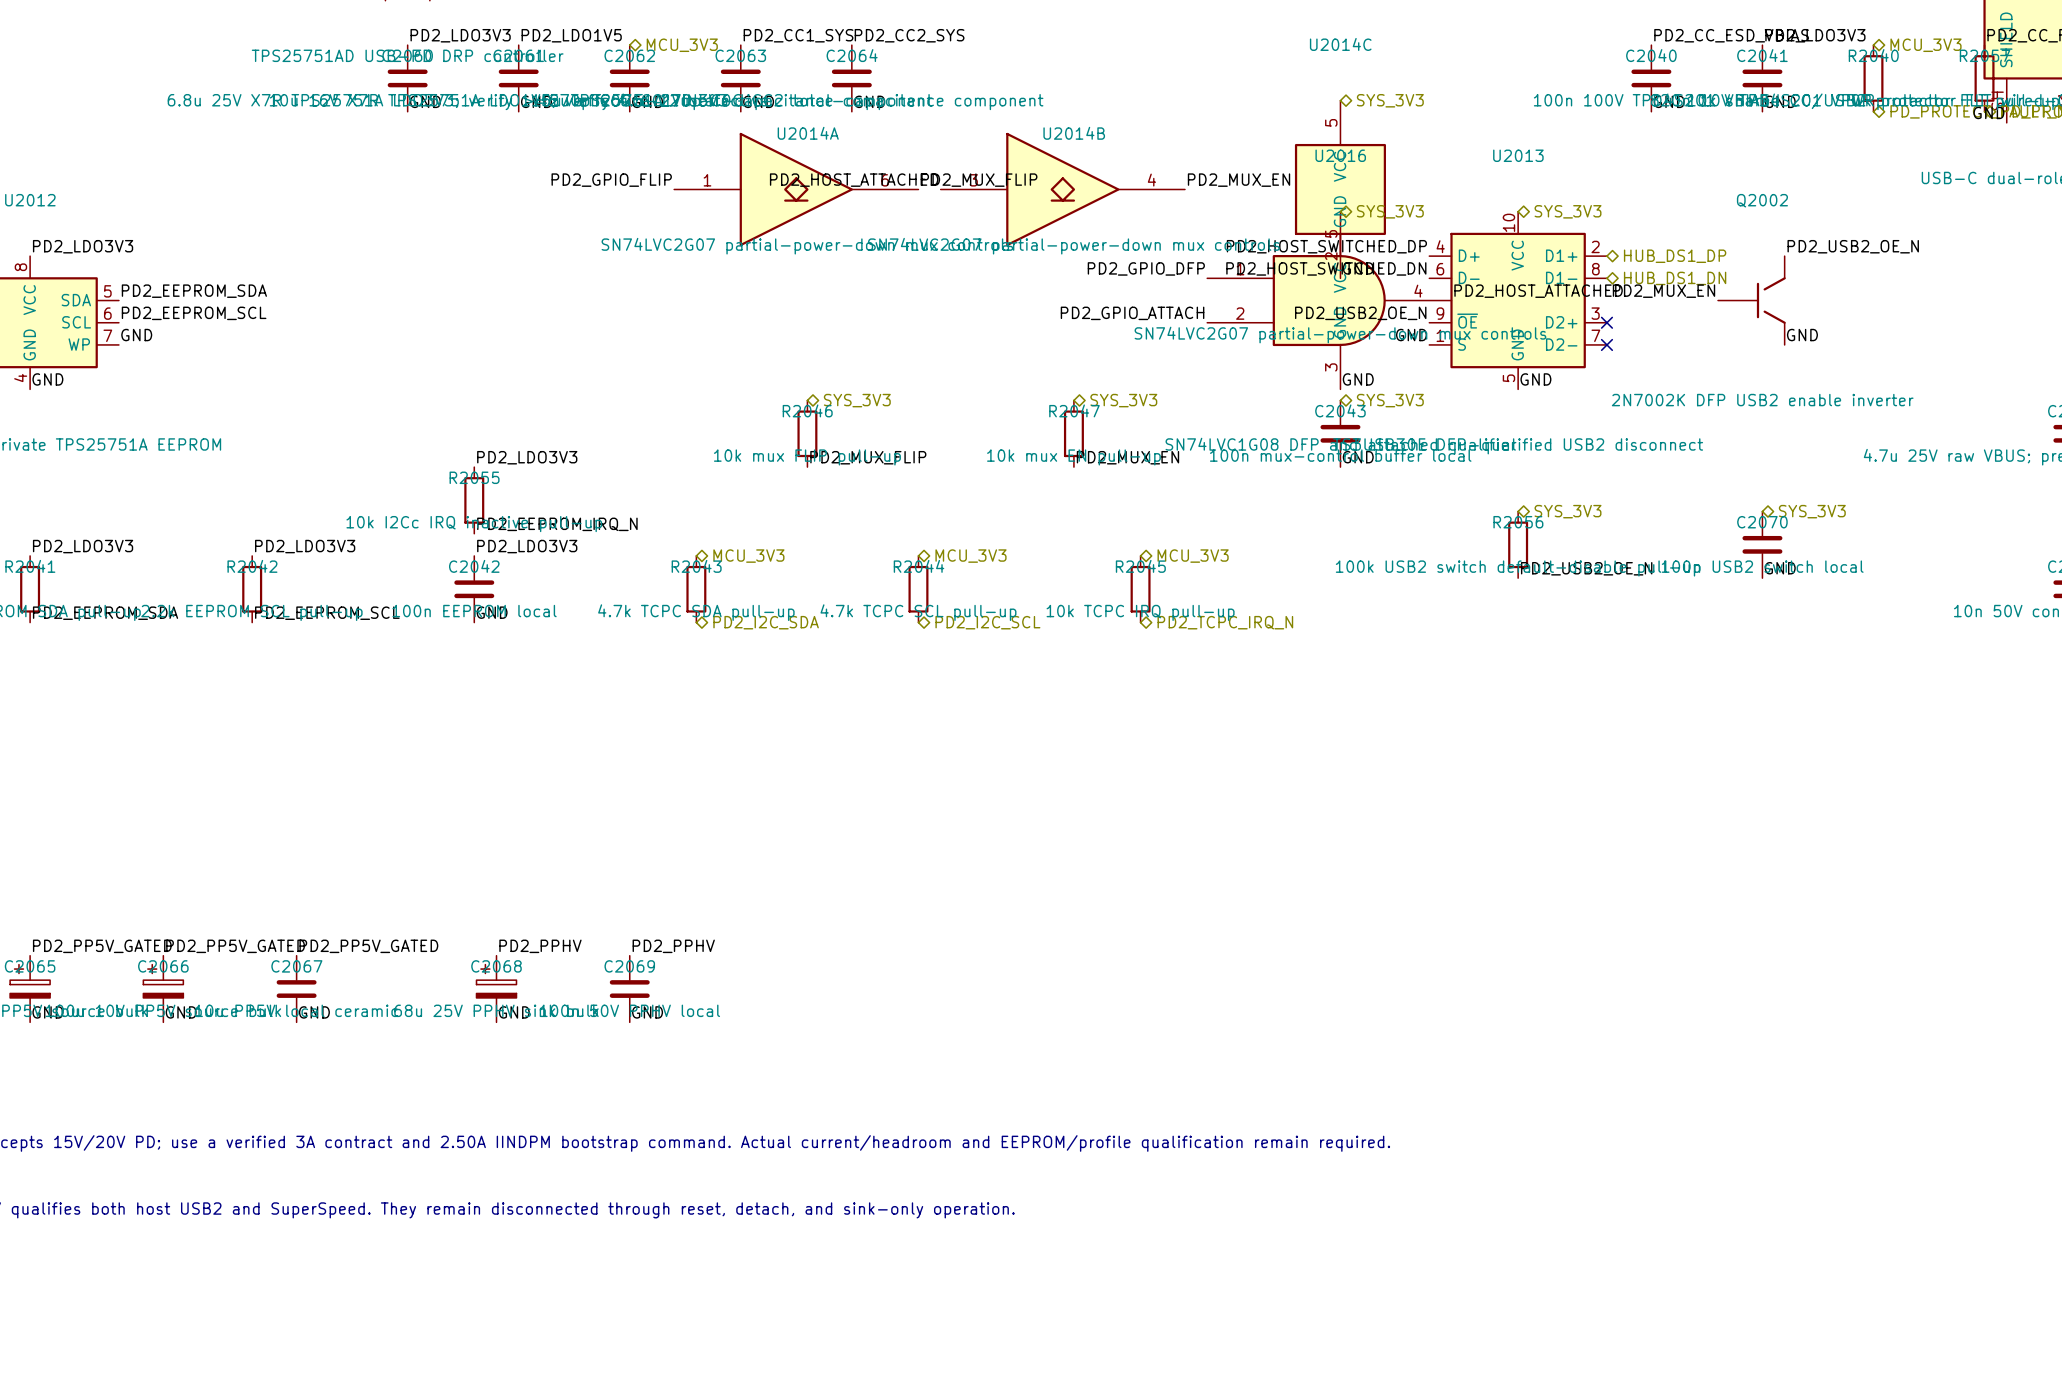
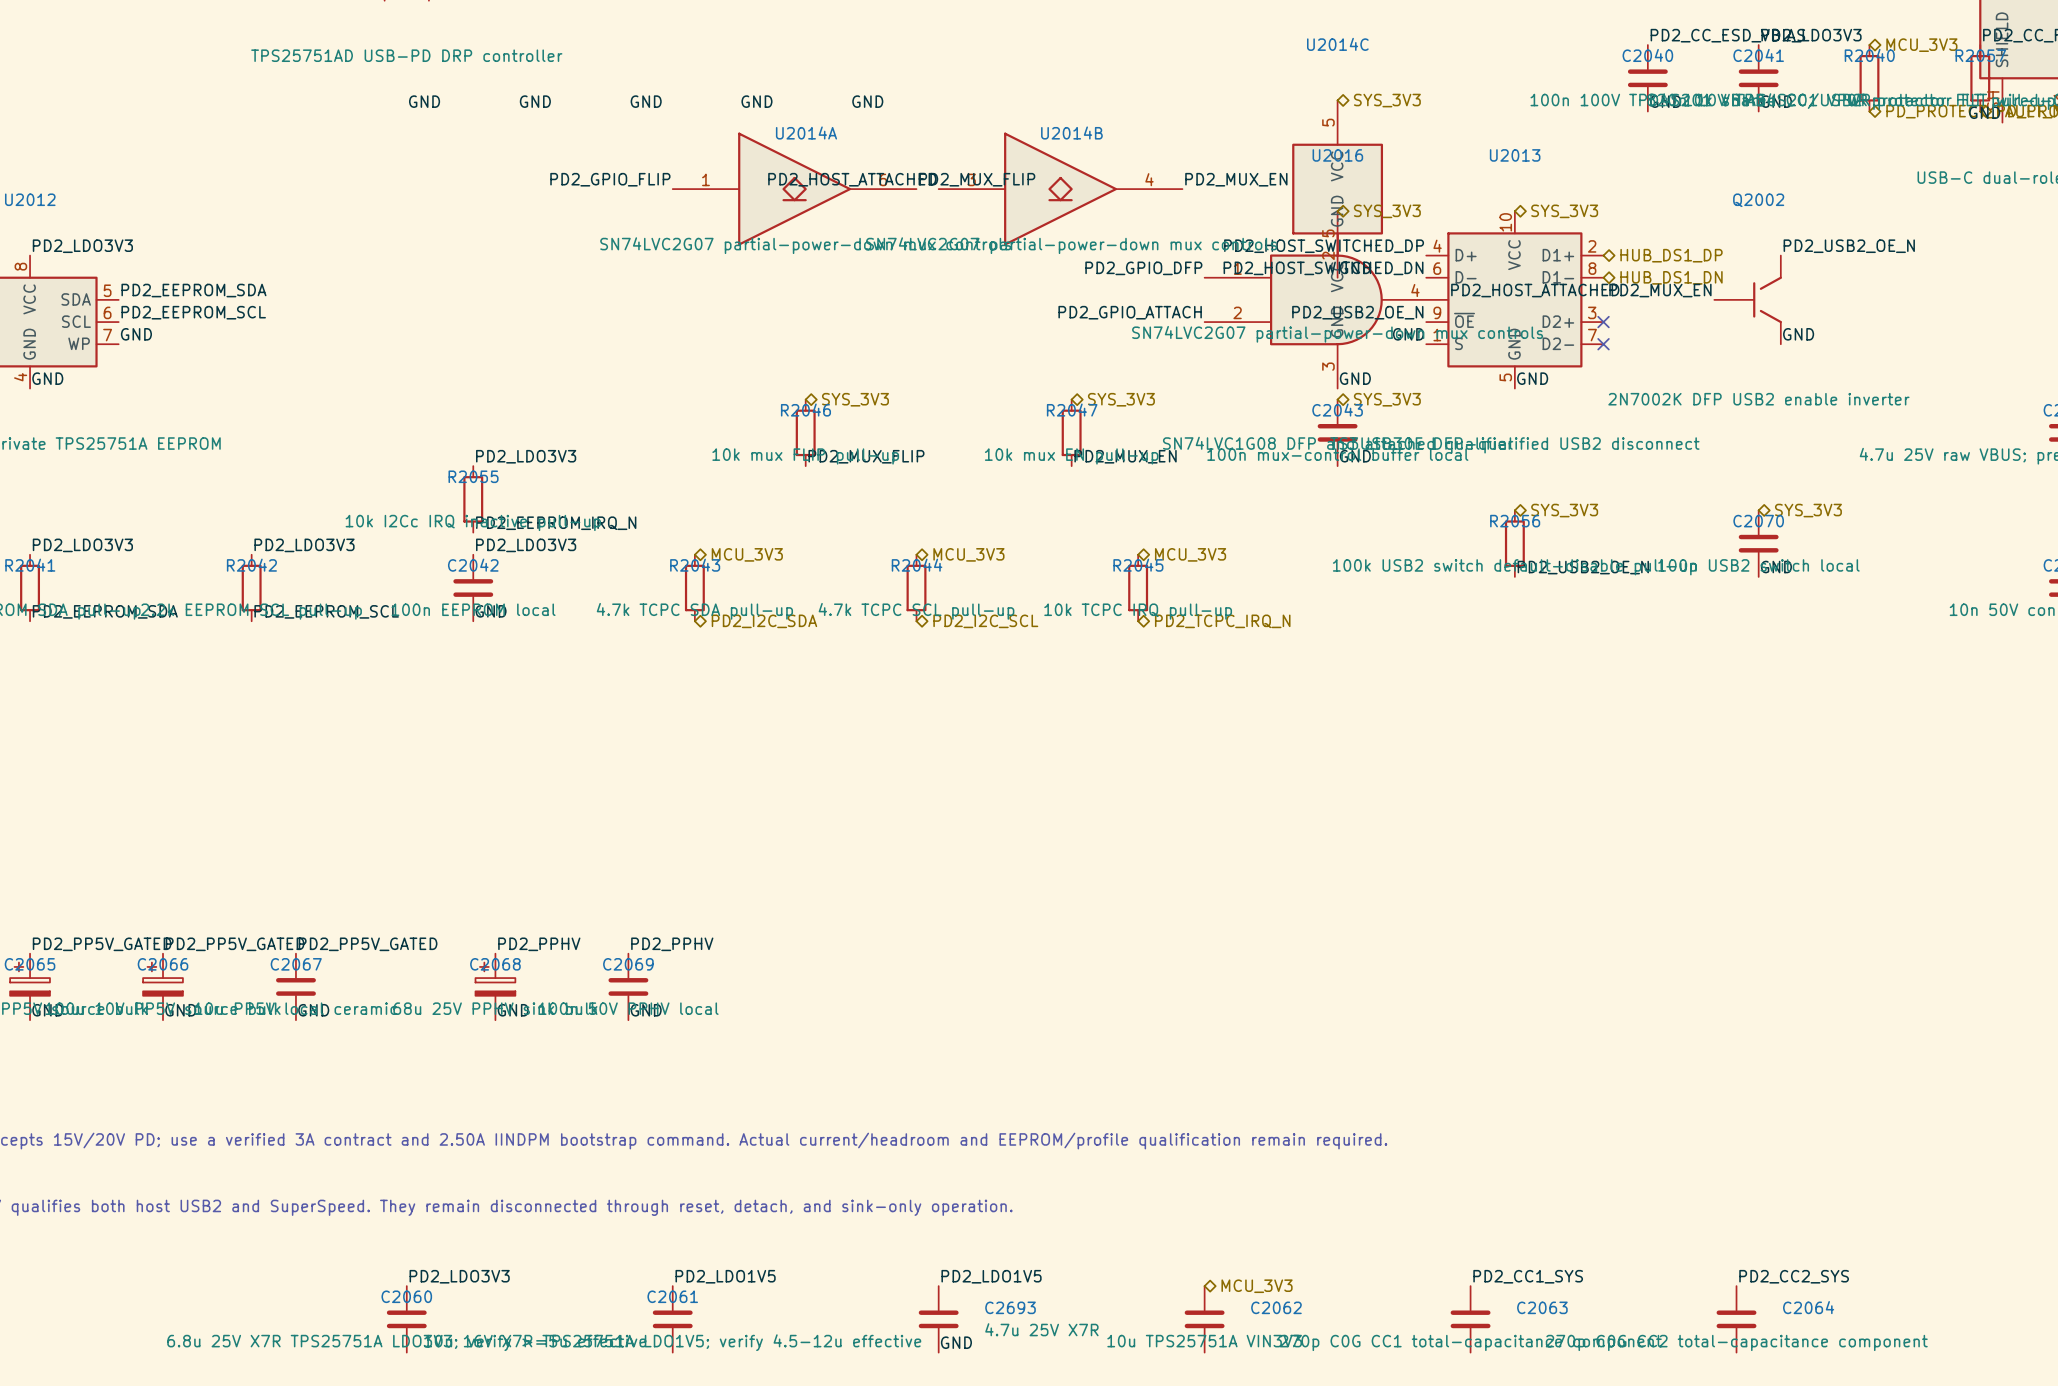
label: PD2_LDO3V3 (460, 35) -> none
label: PD2_LDO1V5 (571, 35) -> none
label: PD2_CC1_SYS (798, 35) -> none
label: PD2_CC2_SYS (909, 35) -> none
hierarchical label: MCU_3V3 (682, 45) -> none
C2062 name position: C2062 (629, 55) -> C2062 (1276, 1307)
C2063 name position: C2063 (740, 55) -> C2063 (1542, 1307)
C2064 name position: C2064 (852, 55) -> C2064 (1808, 1307)
C2060 position: (407, 78) -> (406, 1319)
C2061 position: (518, 78) -> (672, 1319)
C2062 position: (629, 78) -> (1204, 1319)
C2063 position: (740, 78) -> (1470, 1319)
C2064 position: (851, 78) -> (1736, 1319)
label: none -> PD2_LDO3V3 (459, 1276)
label: none -> PD2_LDO1V5 (725, 1276)
label: none -> PD2_LDO1V5 (991, 1276)
label: none -> PD2_CC1_SYS (1528, 1276)
label: none -> PD2_CC2_SYS (1794, 1276)
hierarchical label: none -> MCU_3V3 (1257, 1286)
C2693: none -> 4.7u 25V X7R (938, 1319)
label: none -> GND (956, 1342)

